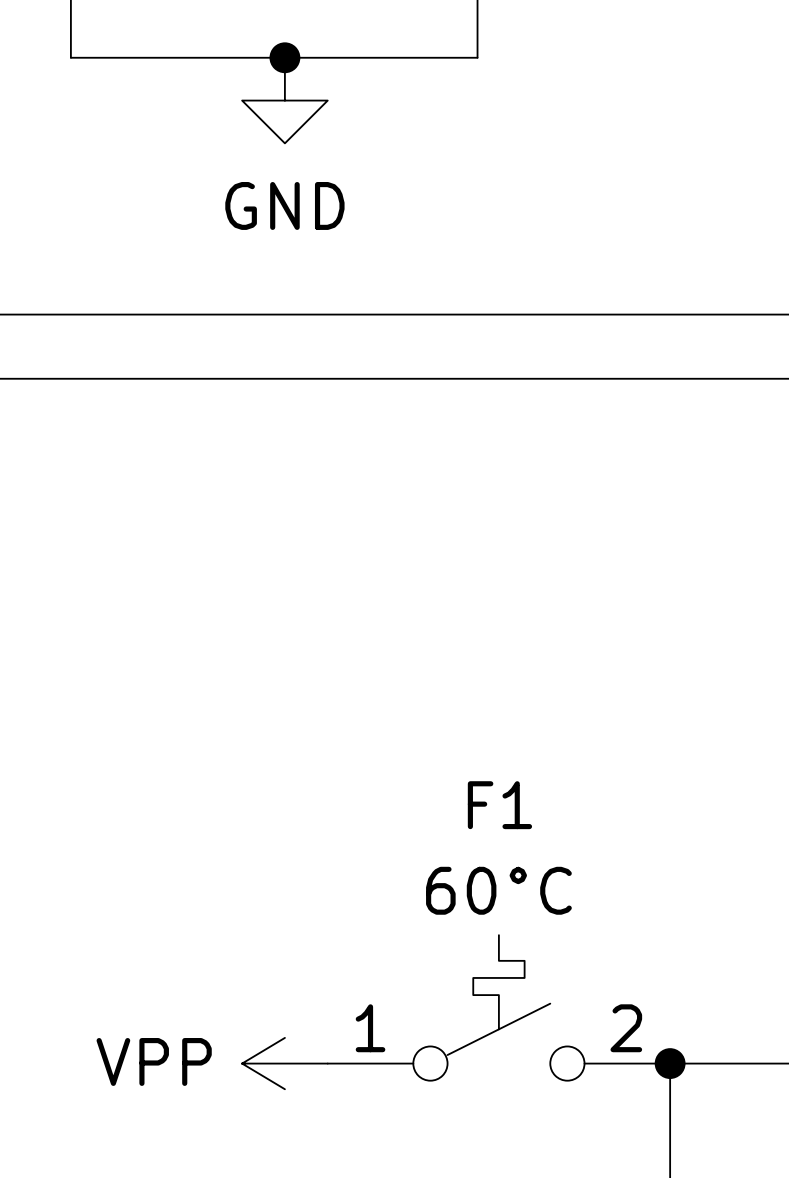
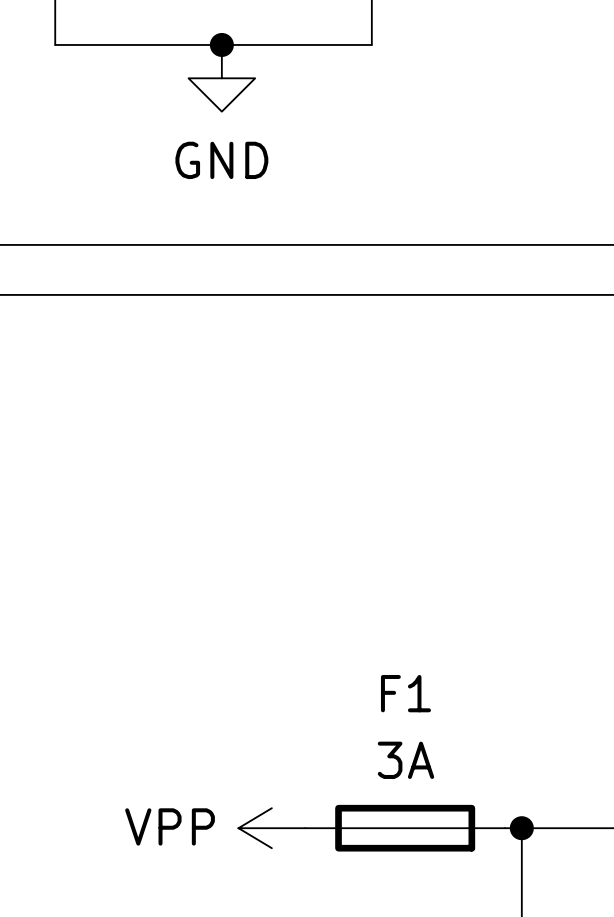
F1 value: 60°C (498, 890) -> 3A (405, 760)
F1 symbol: [327, 935, 671, 1081] -> [305, 804, 506, 852]
power symbol position: VPP (284, 1063) -> VPP (271, 828)

